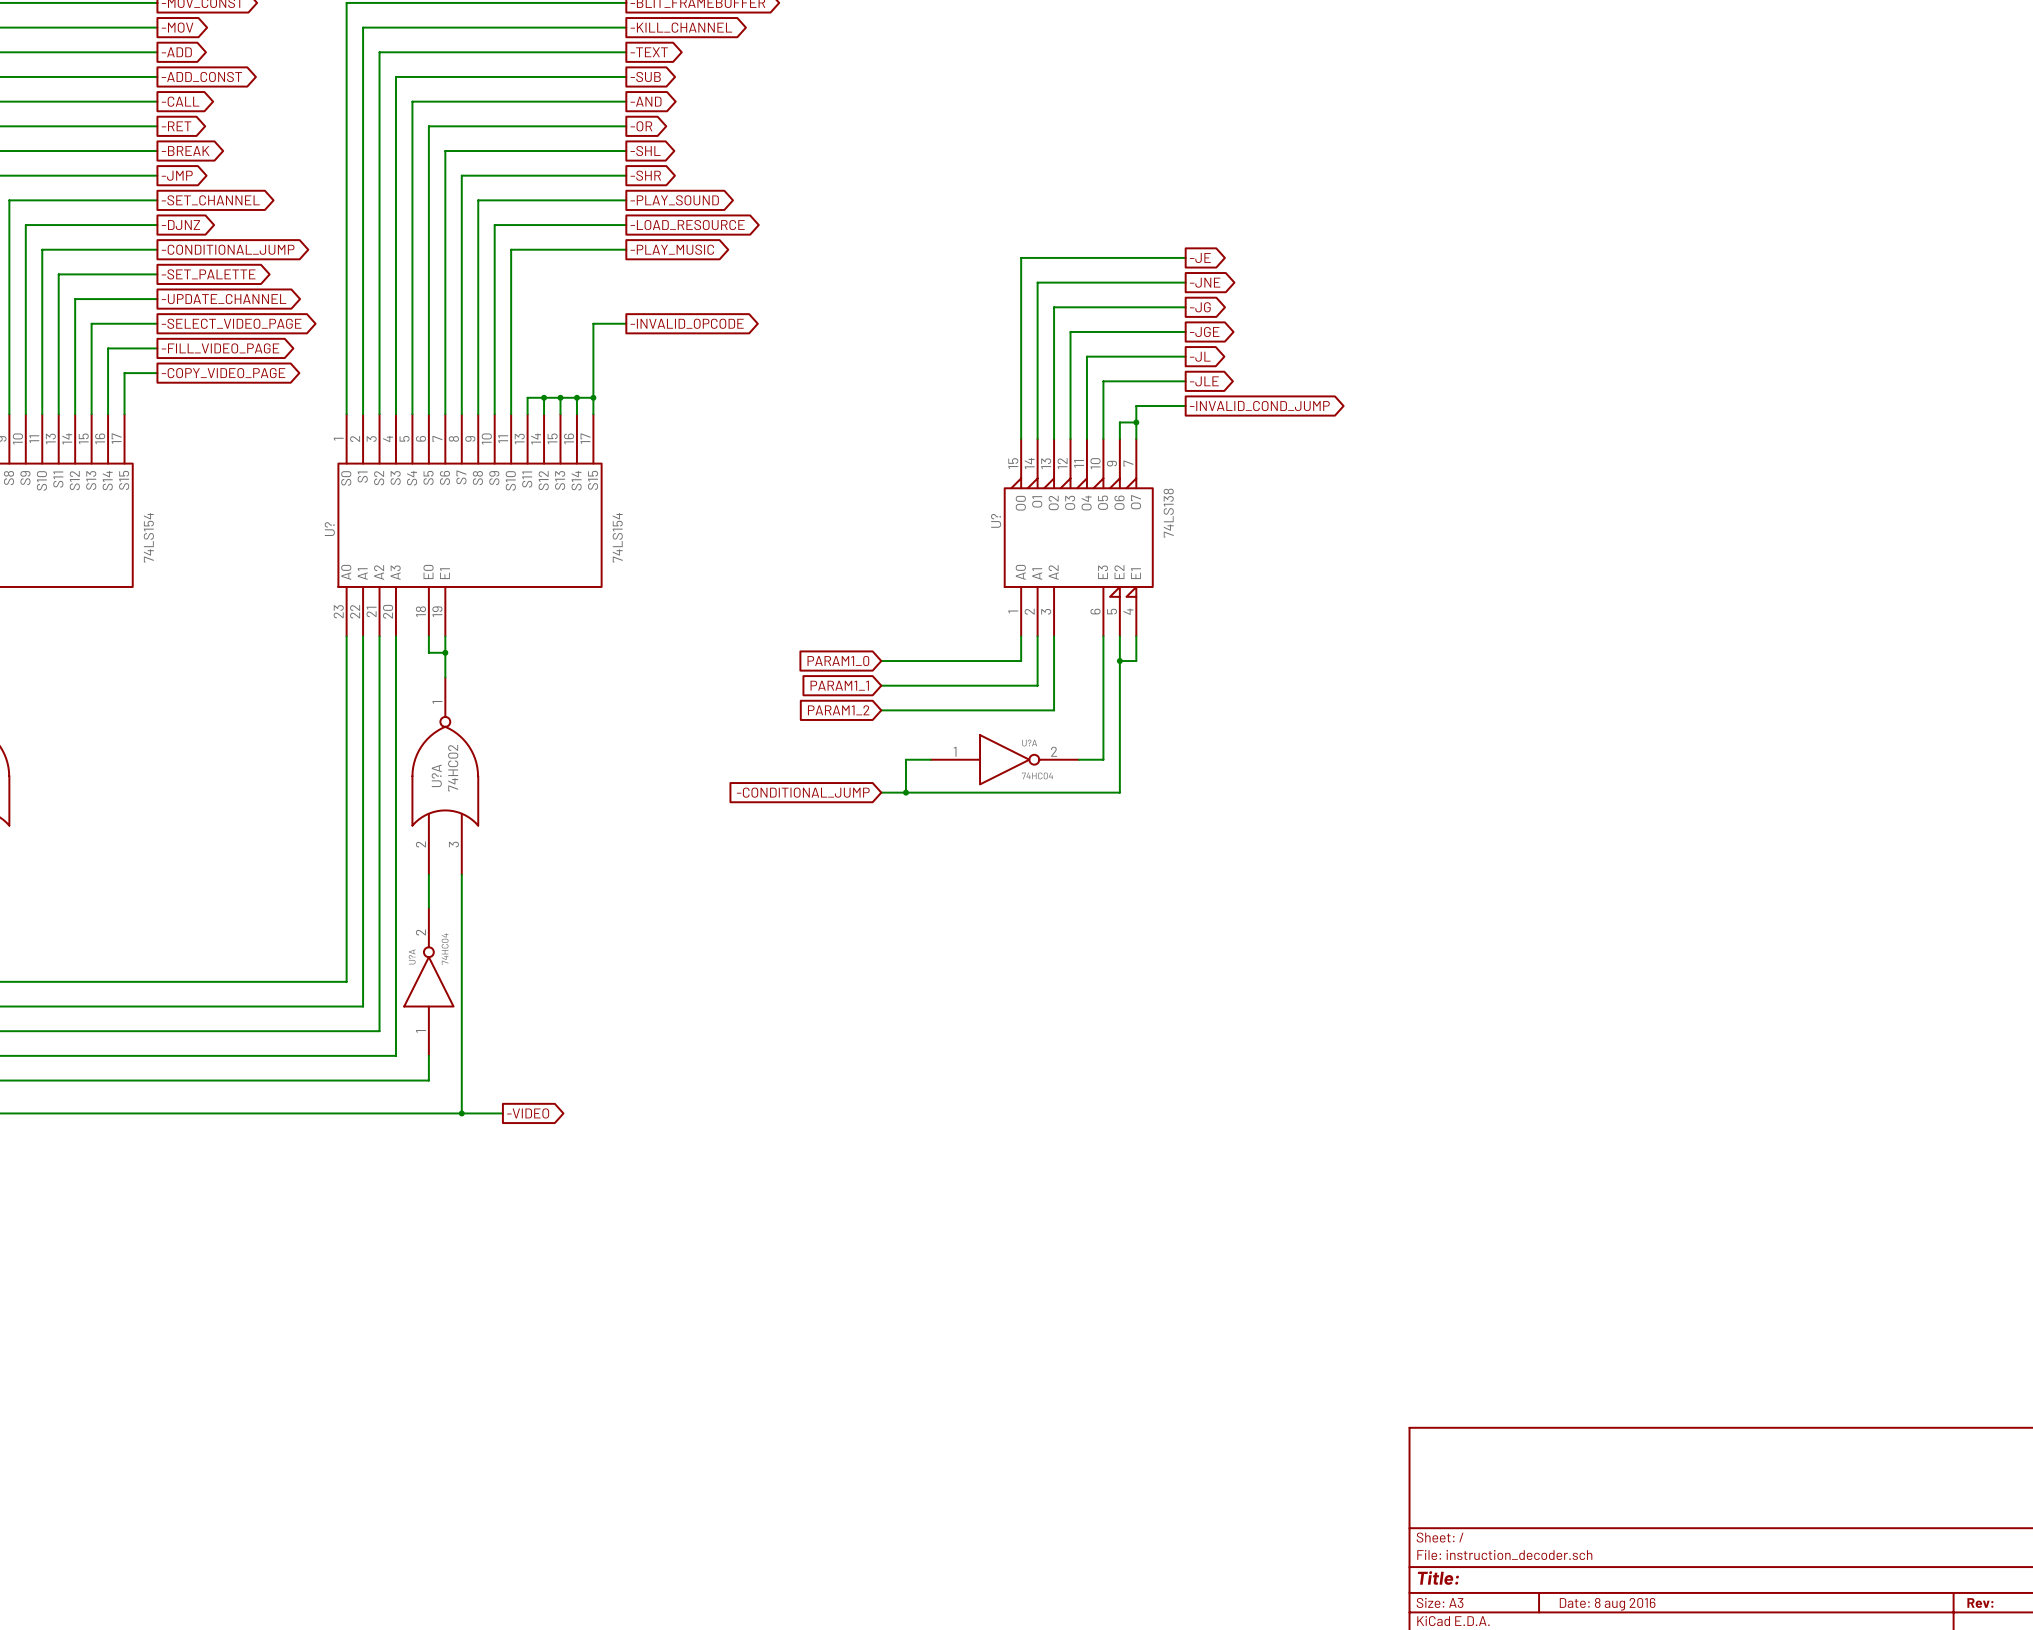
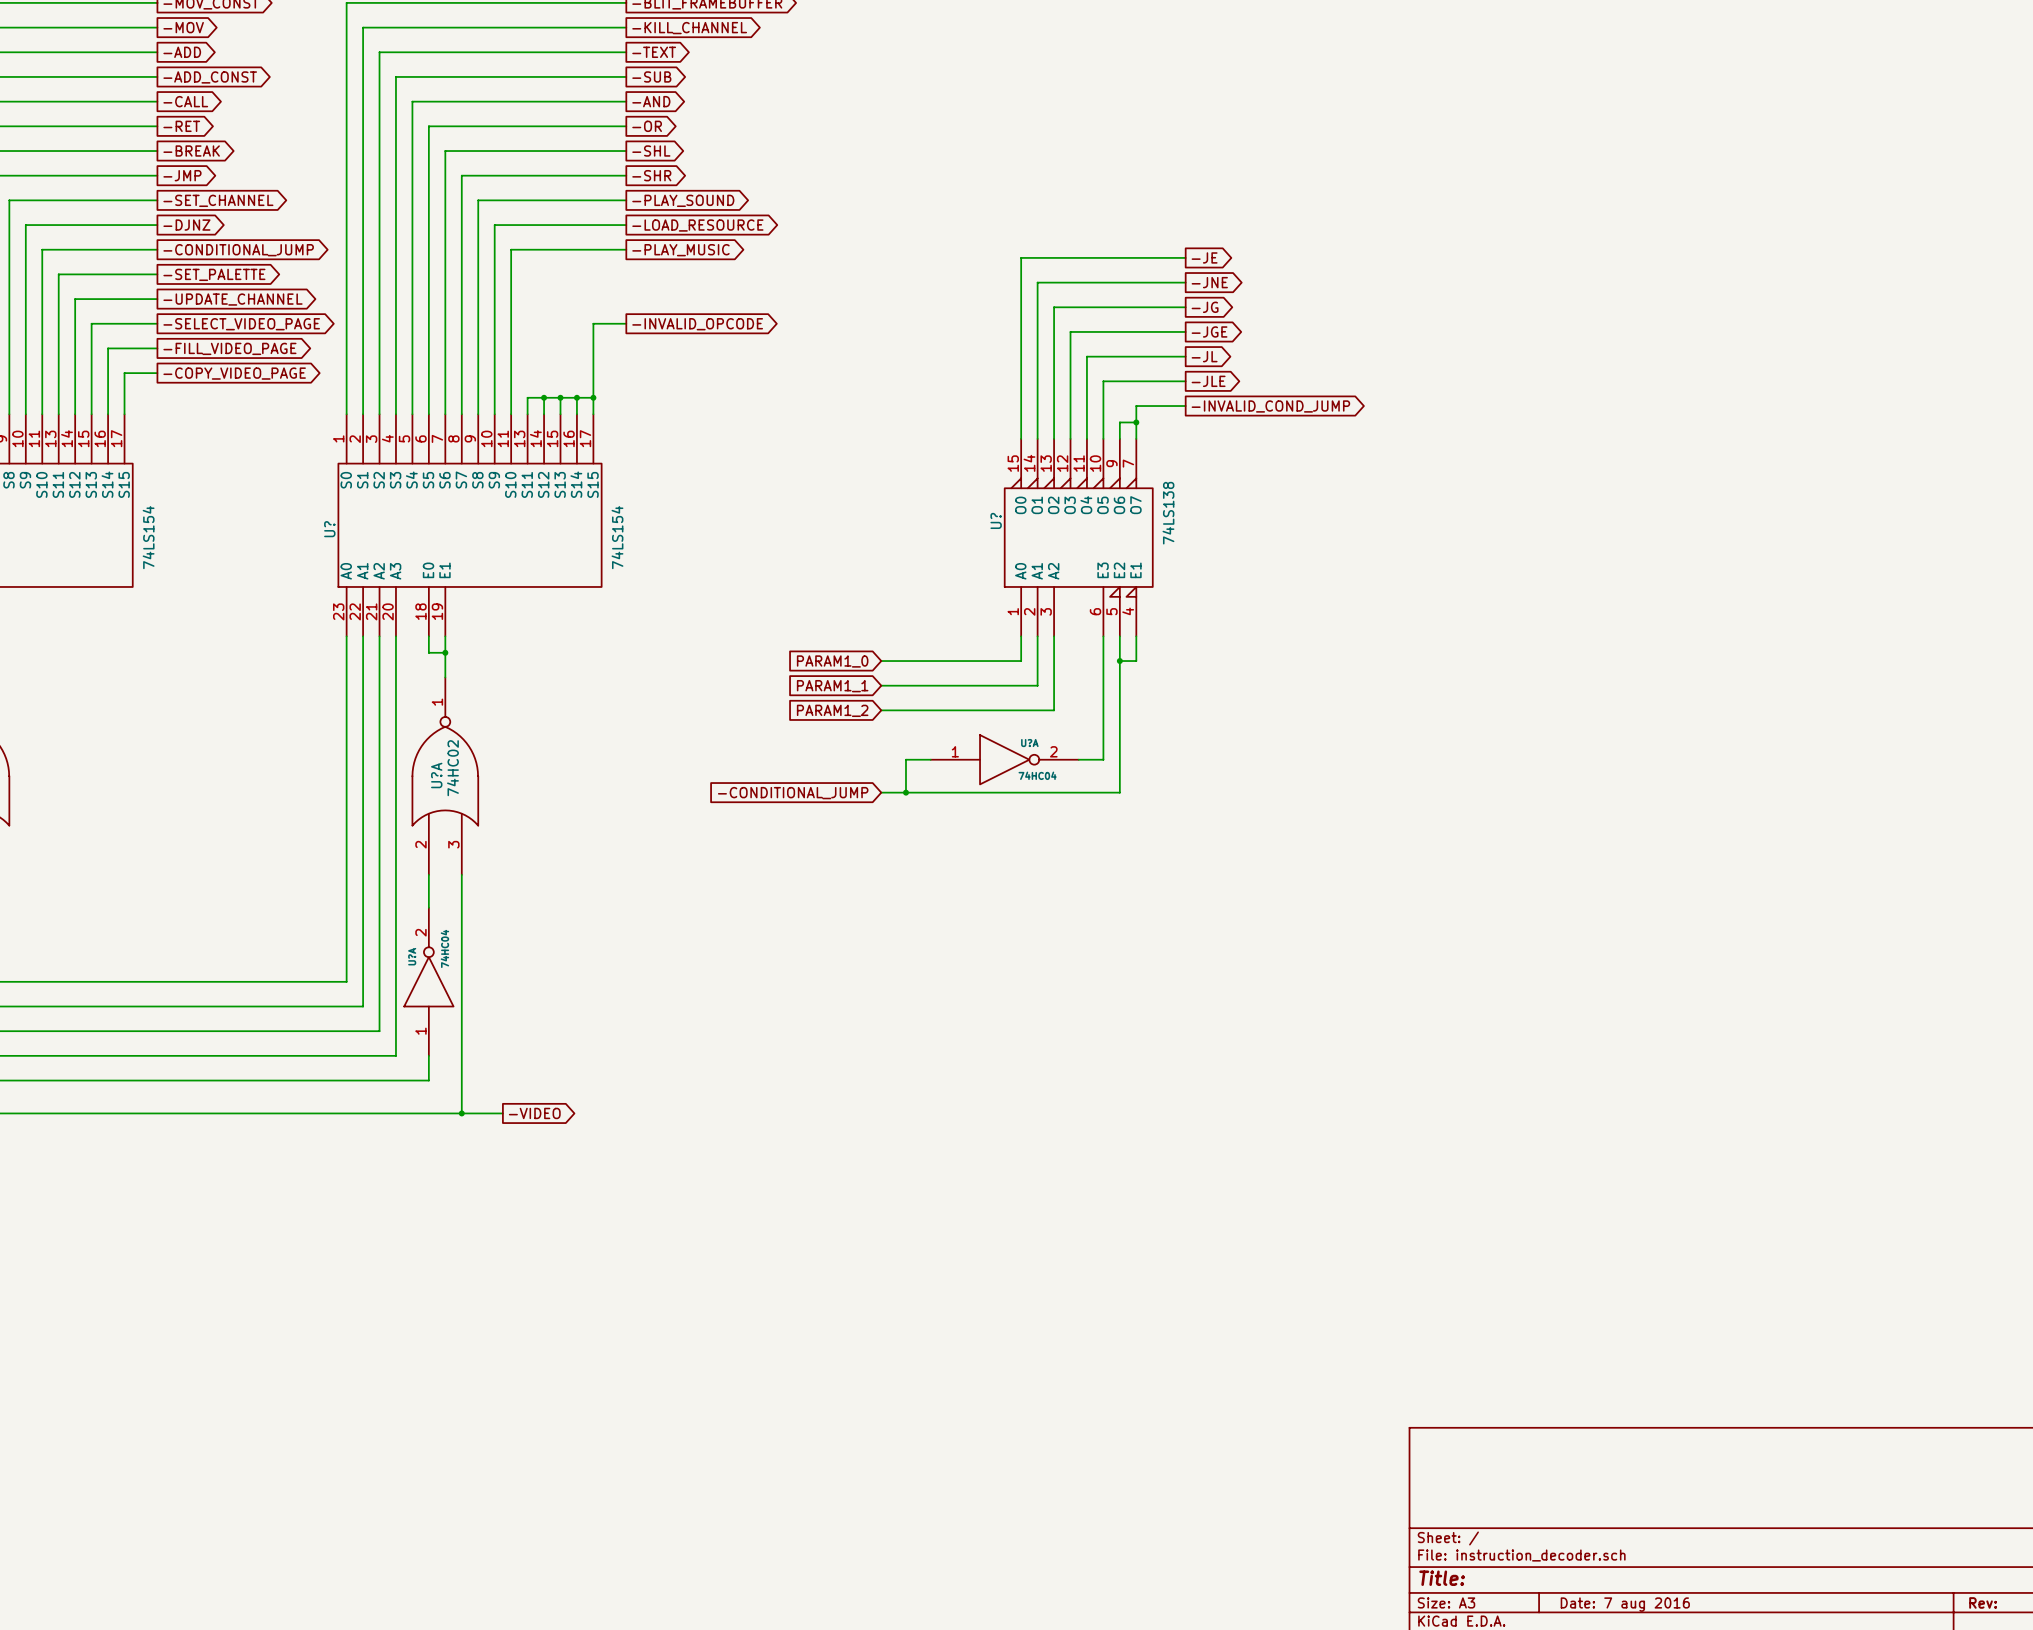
title block: Date: 8 aug 2016 (1607, 1604) -> Date: 7 aug 2016 (1625, 1604)

